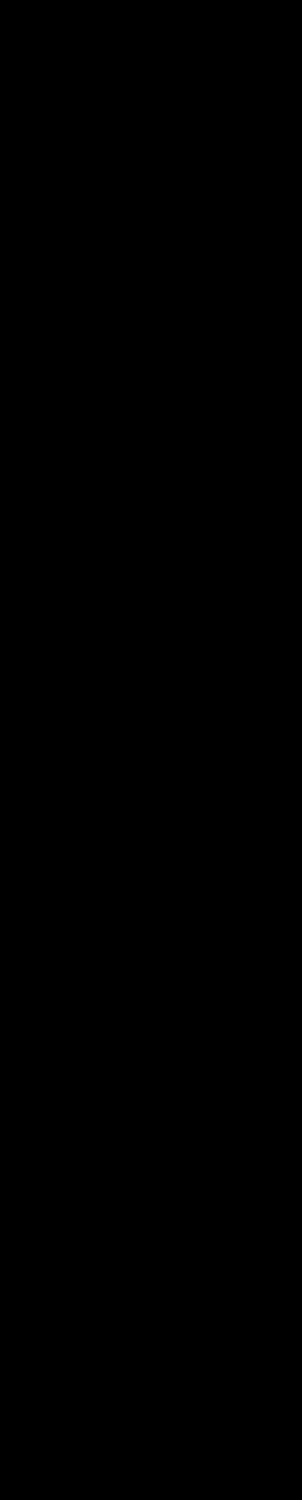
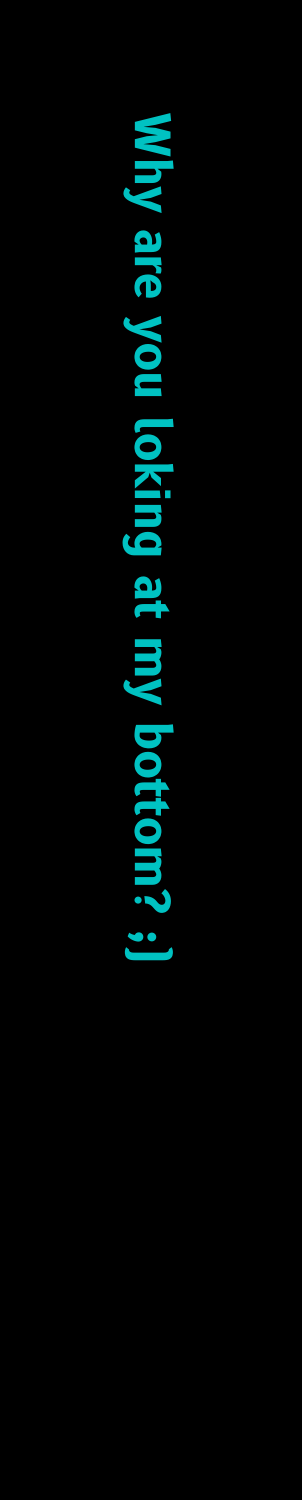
text: none -> Why are you loking at my bottom? ;) (148, 536)

